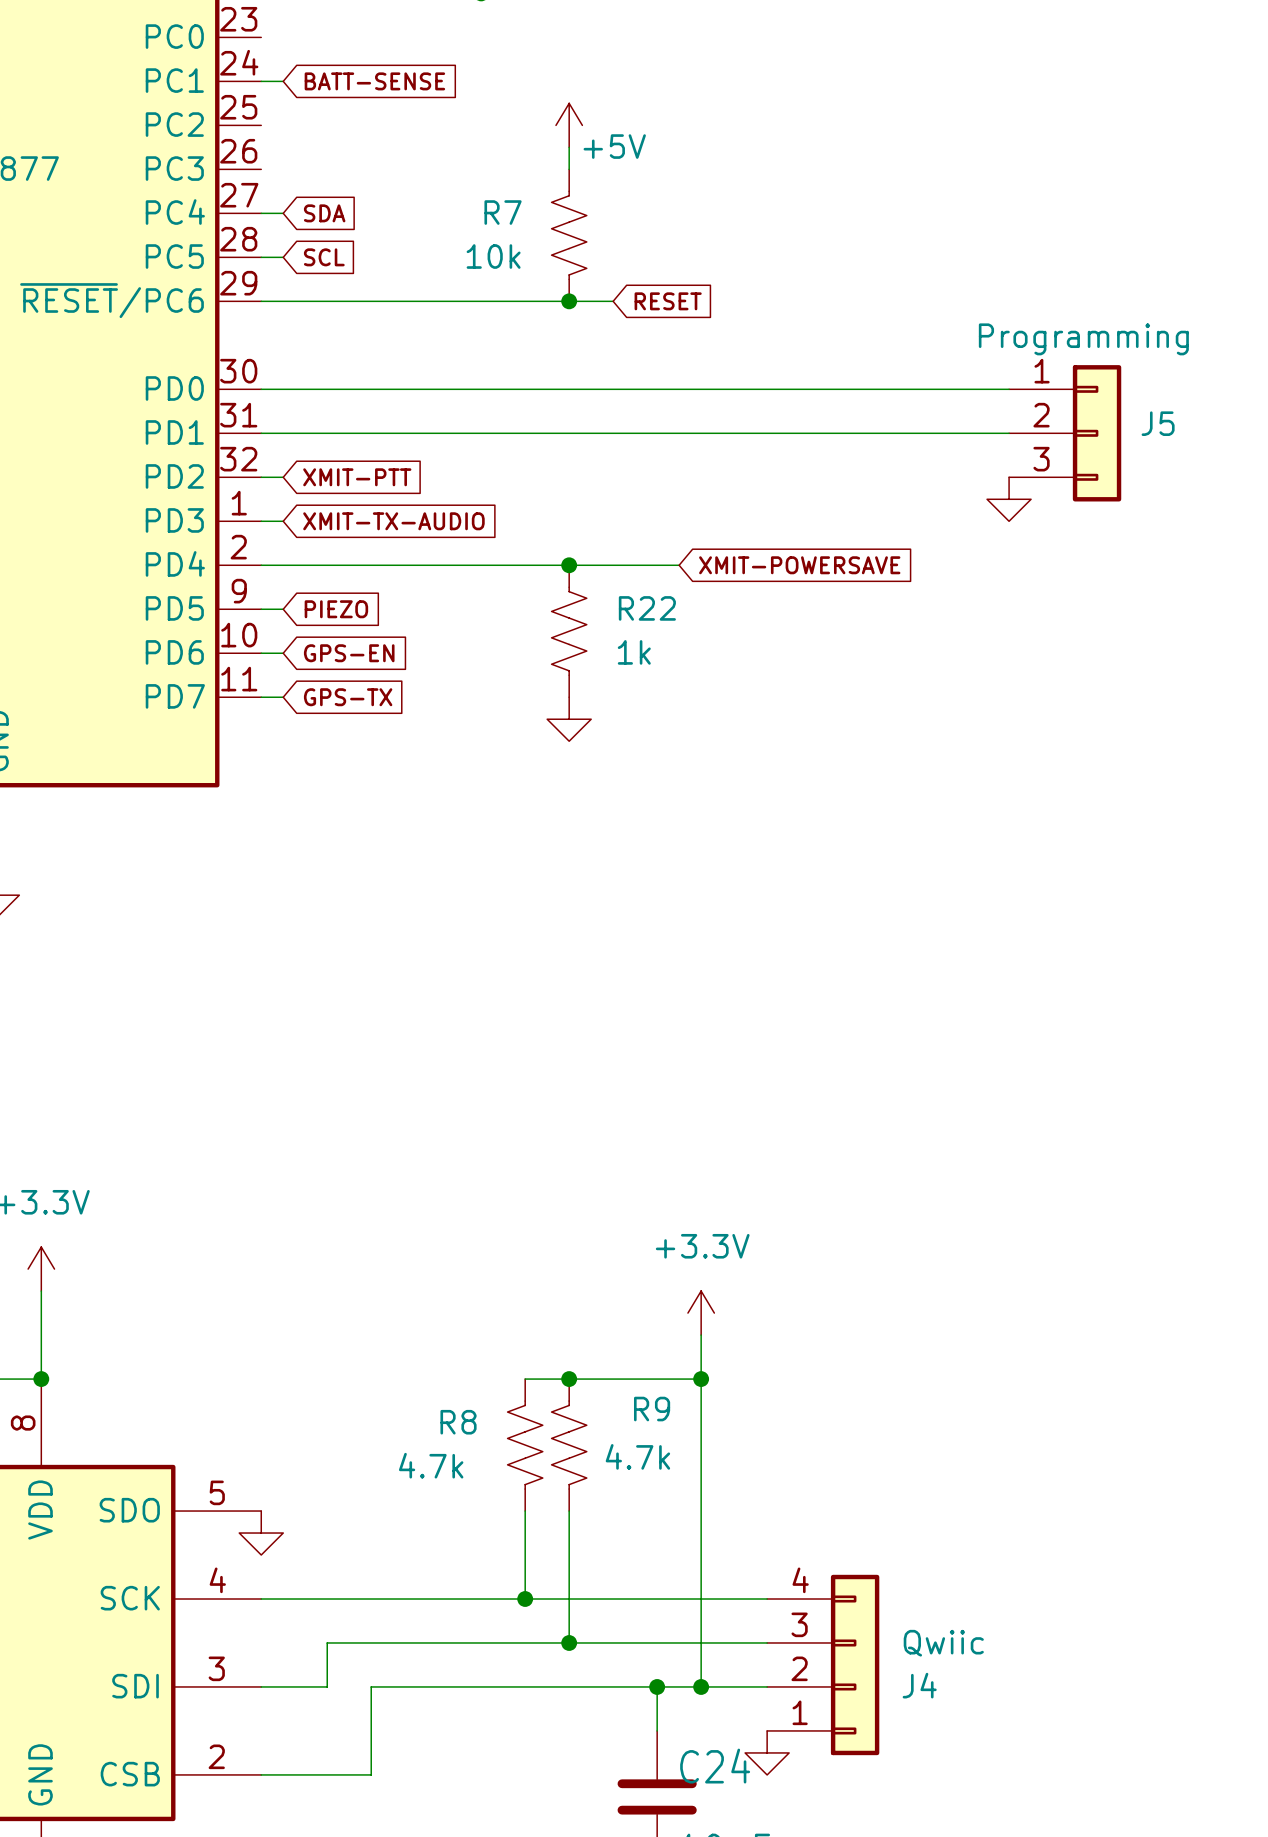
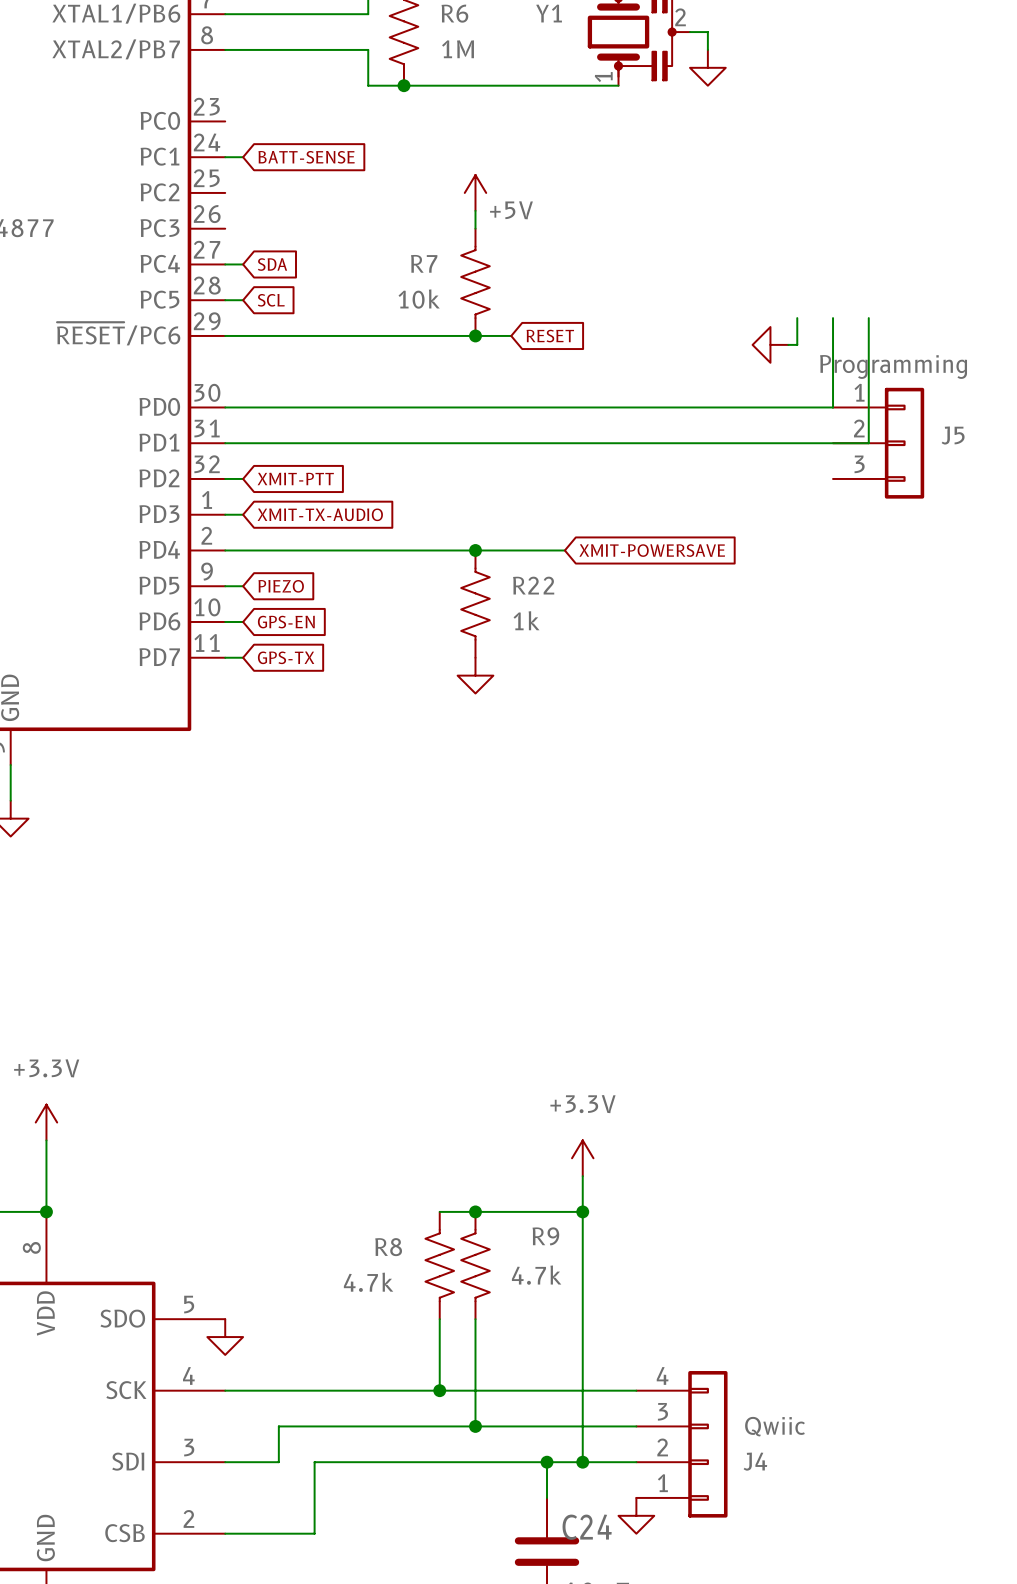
wire: none -> (797, 318) (797, 344) (788, 344)
wire: none -> (833, 318) (833, 407)
wire: none -> (868, 318) (868, 443) (833, 443)
power symbol rotation: 0° (1009, 499) -> 90° clockwise (770, 344)
power symbol position: (1009, 499) -> (770, 344)

